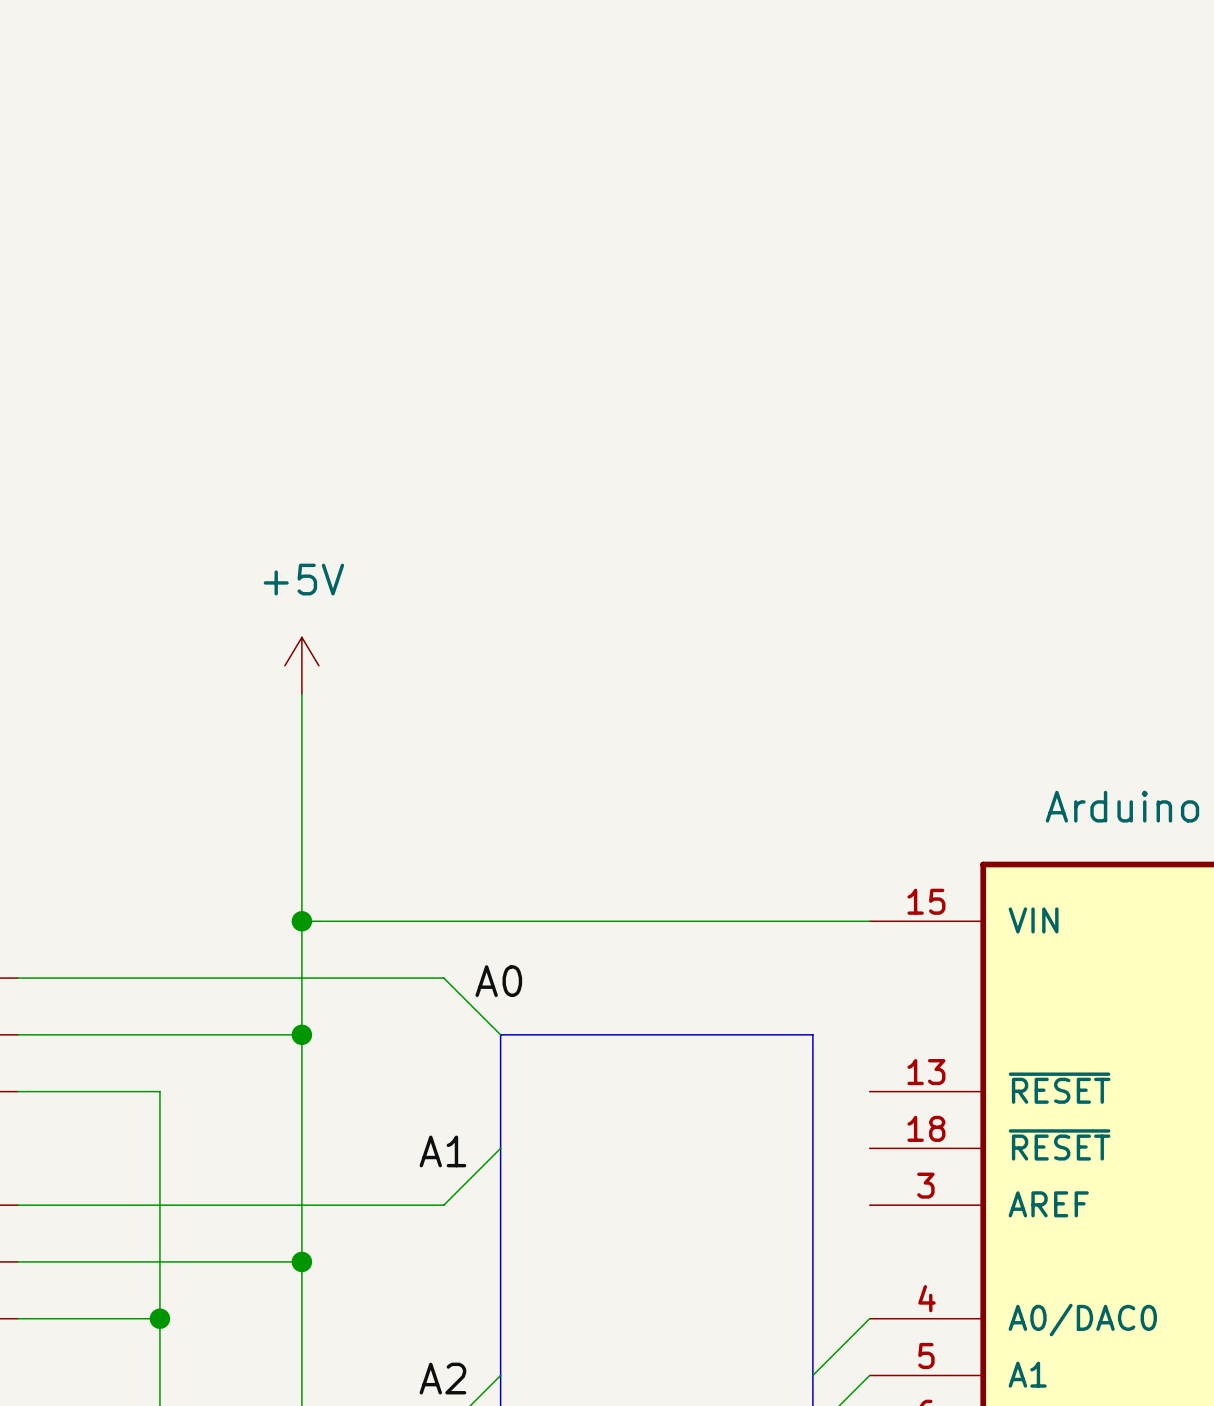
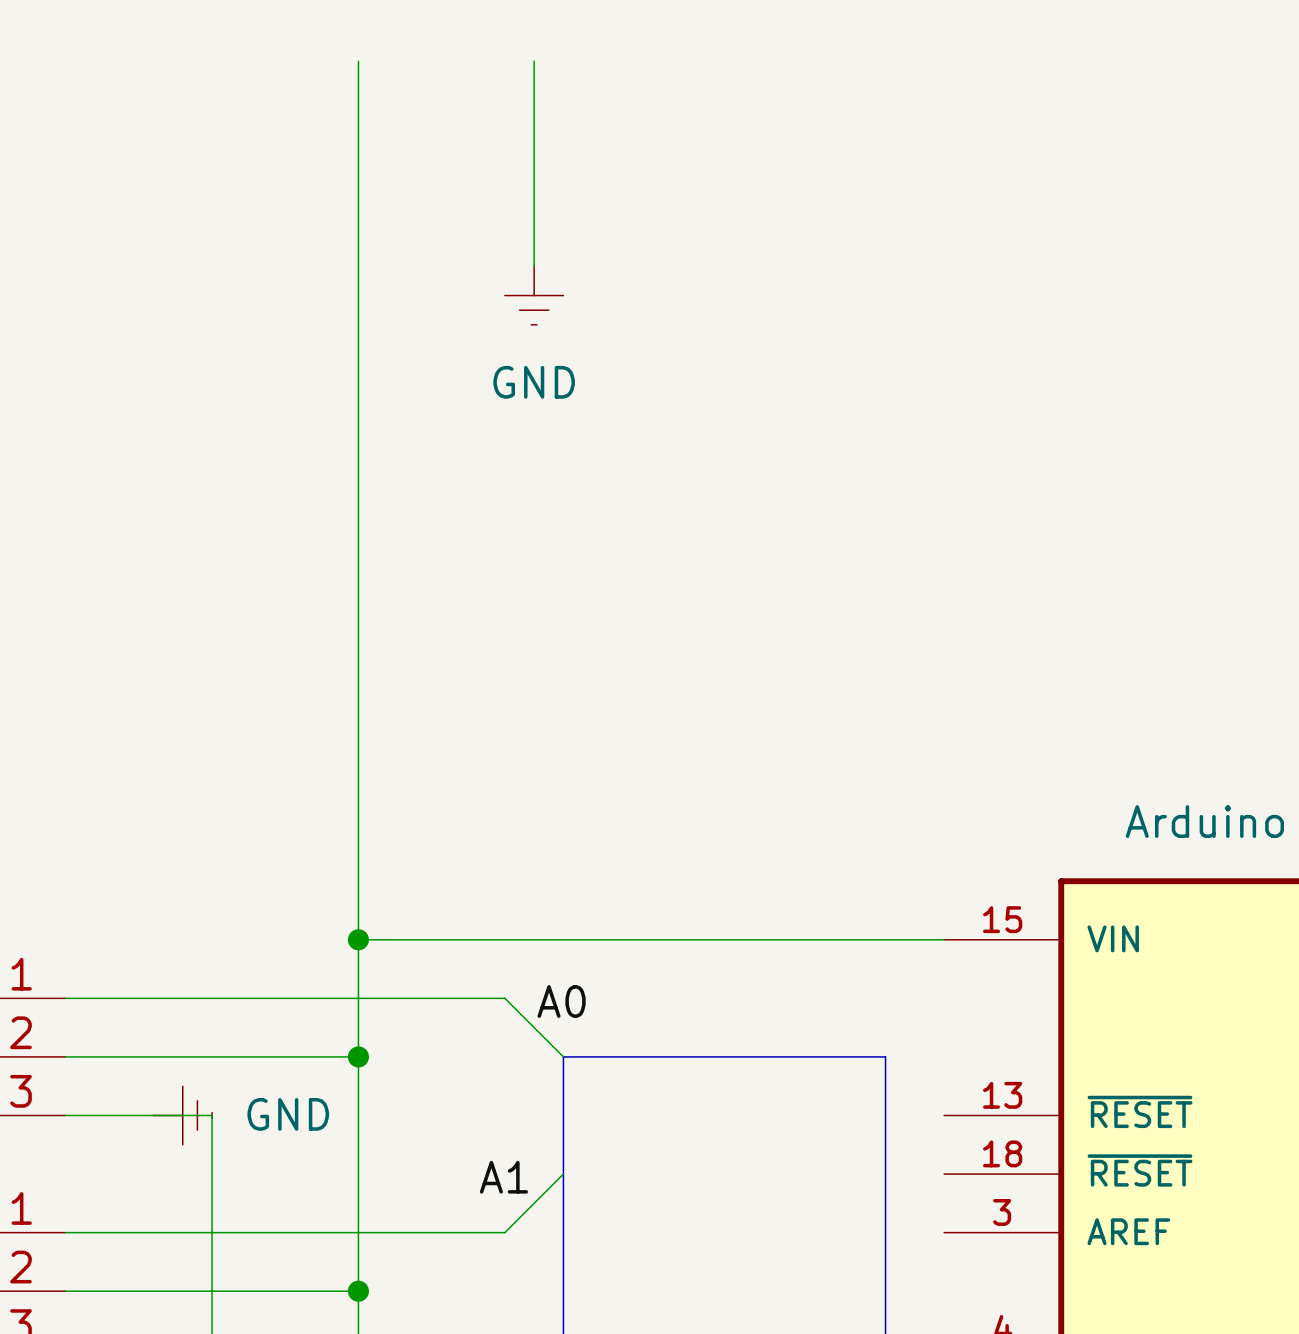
wire: none -> (358, 61) (358, 705)
wire: none -> (534, 61) (534, 266)
power symbol: none -> GND (534, 295)
power symbol: +5V (301, 665) -> none
power symbol: none -> GND (182, 1115)

